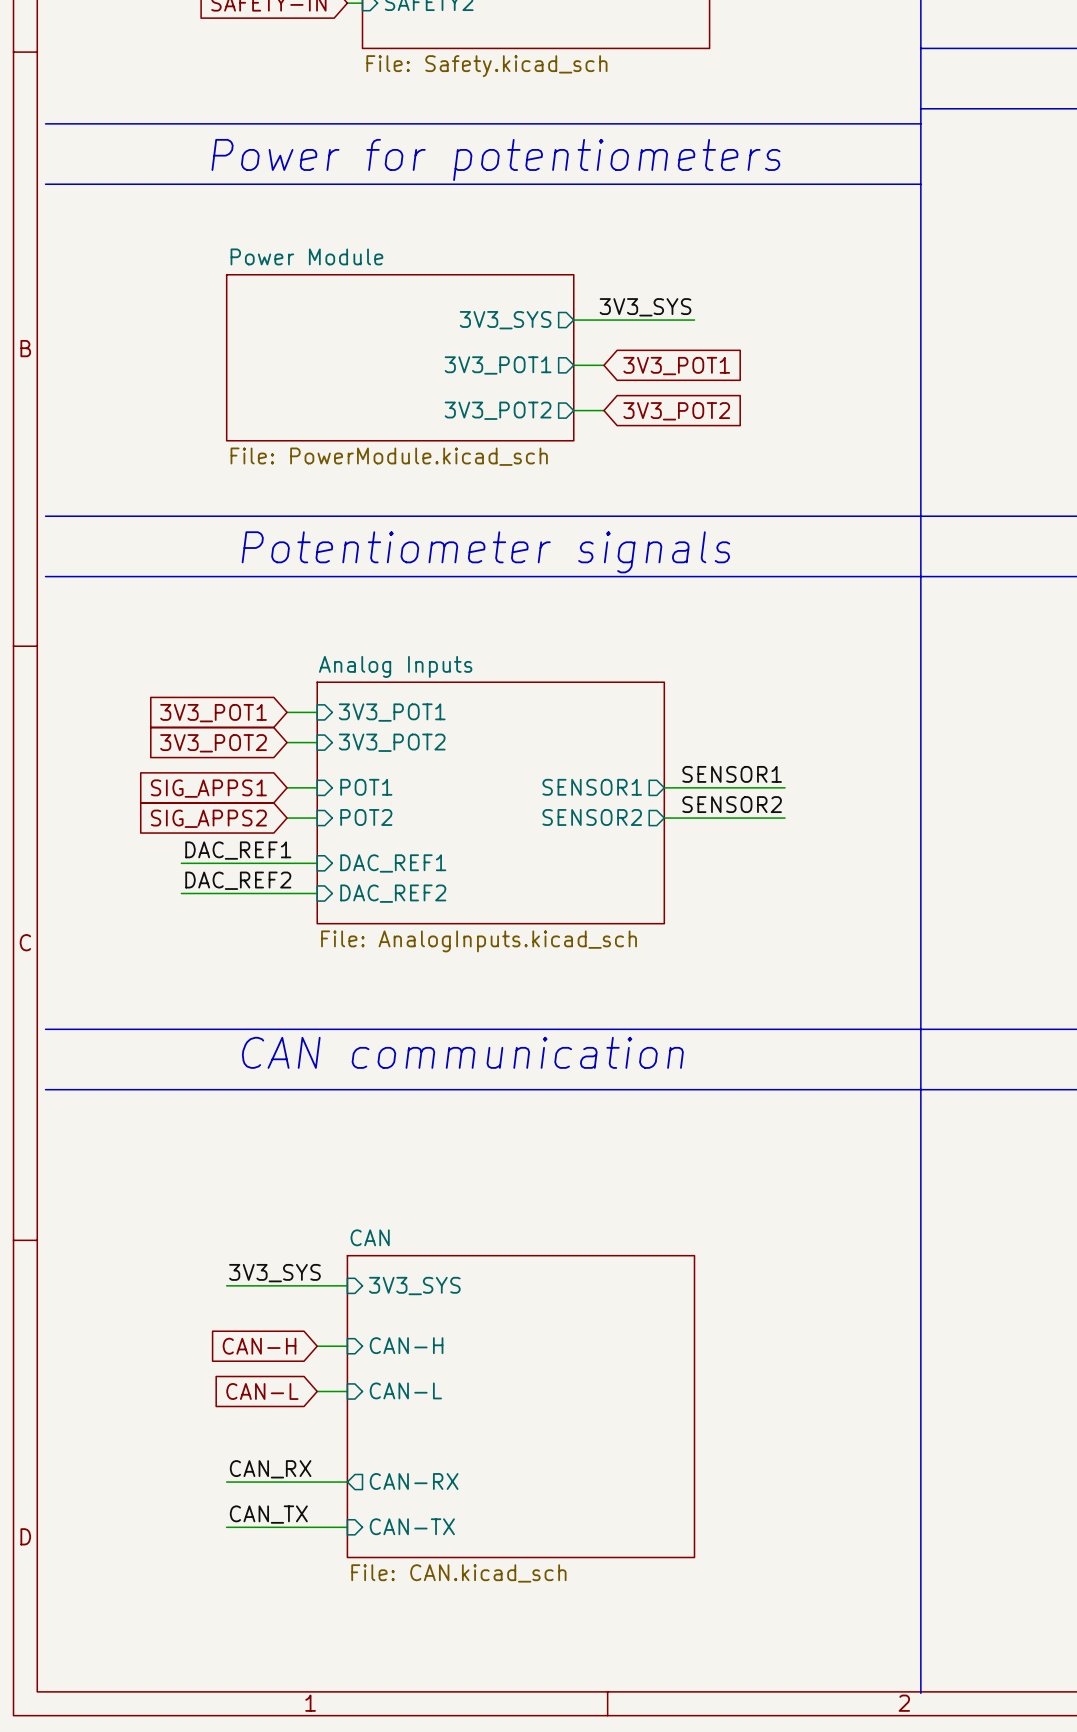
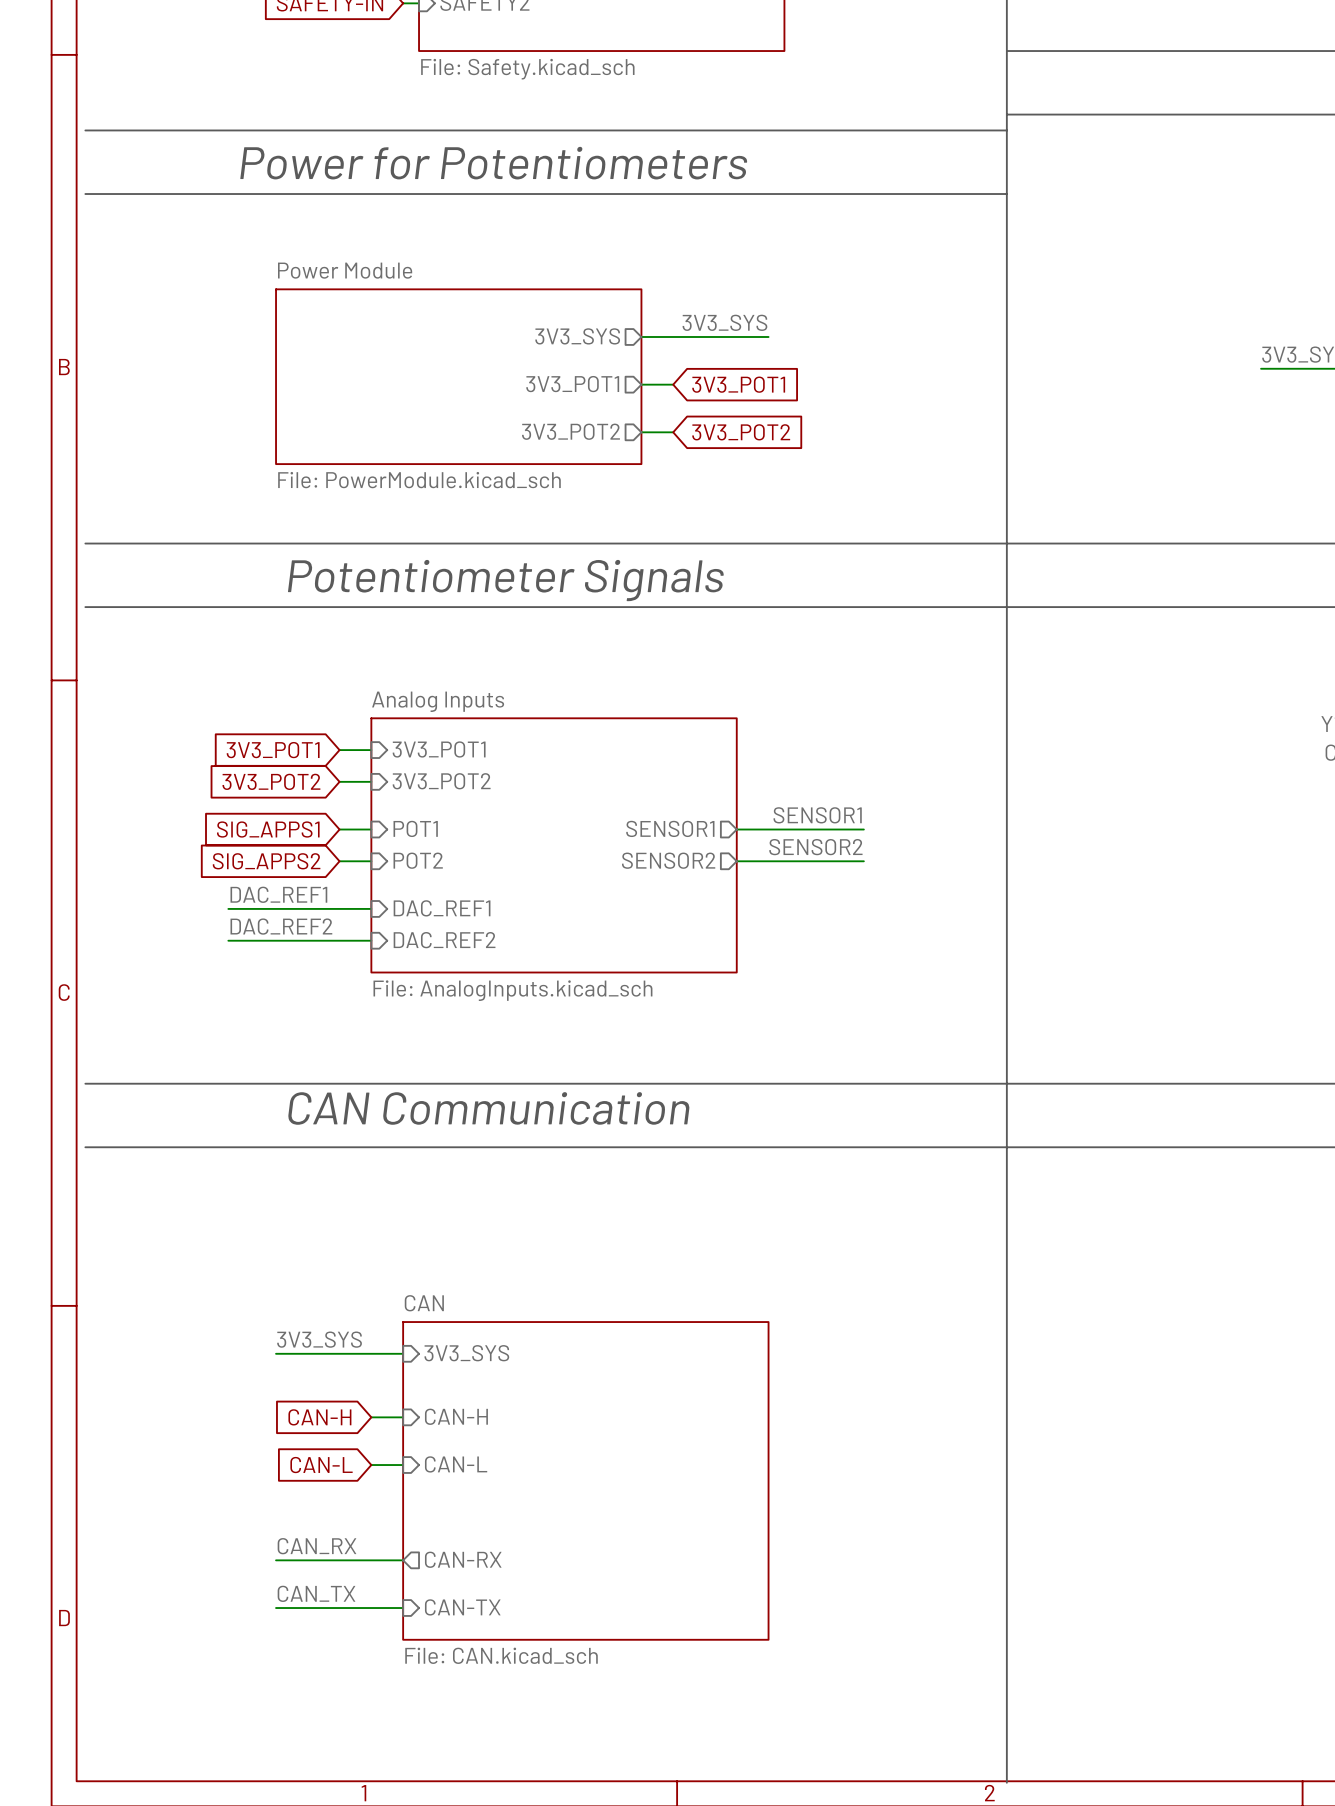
text: Power for potentiometers (496, 159) -> Power for Potentiometers (493, 163)
text: Potentiometer signals (485, 552) -> Potentiometer Signals (505, 580)
text: CAN communication (462, 1052) -> CAN Communication (488, 1108)

